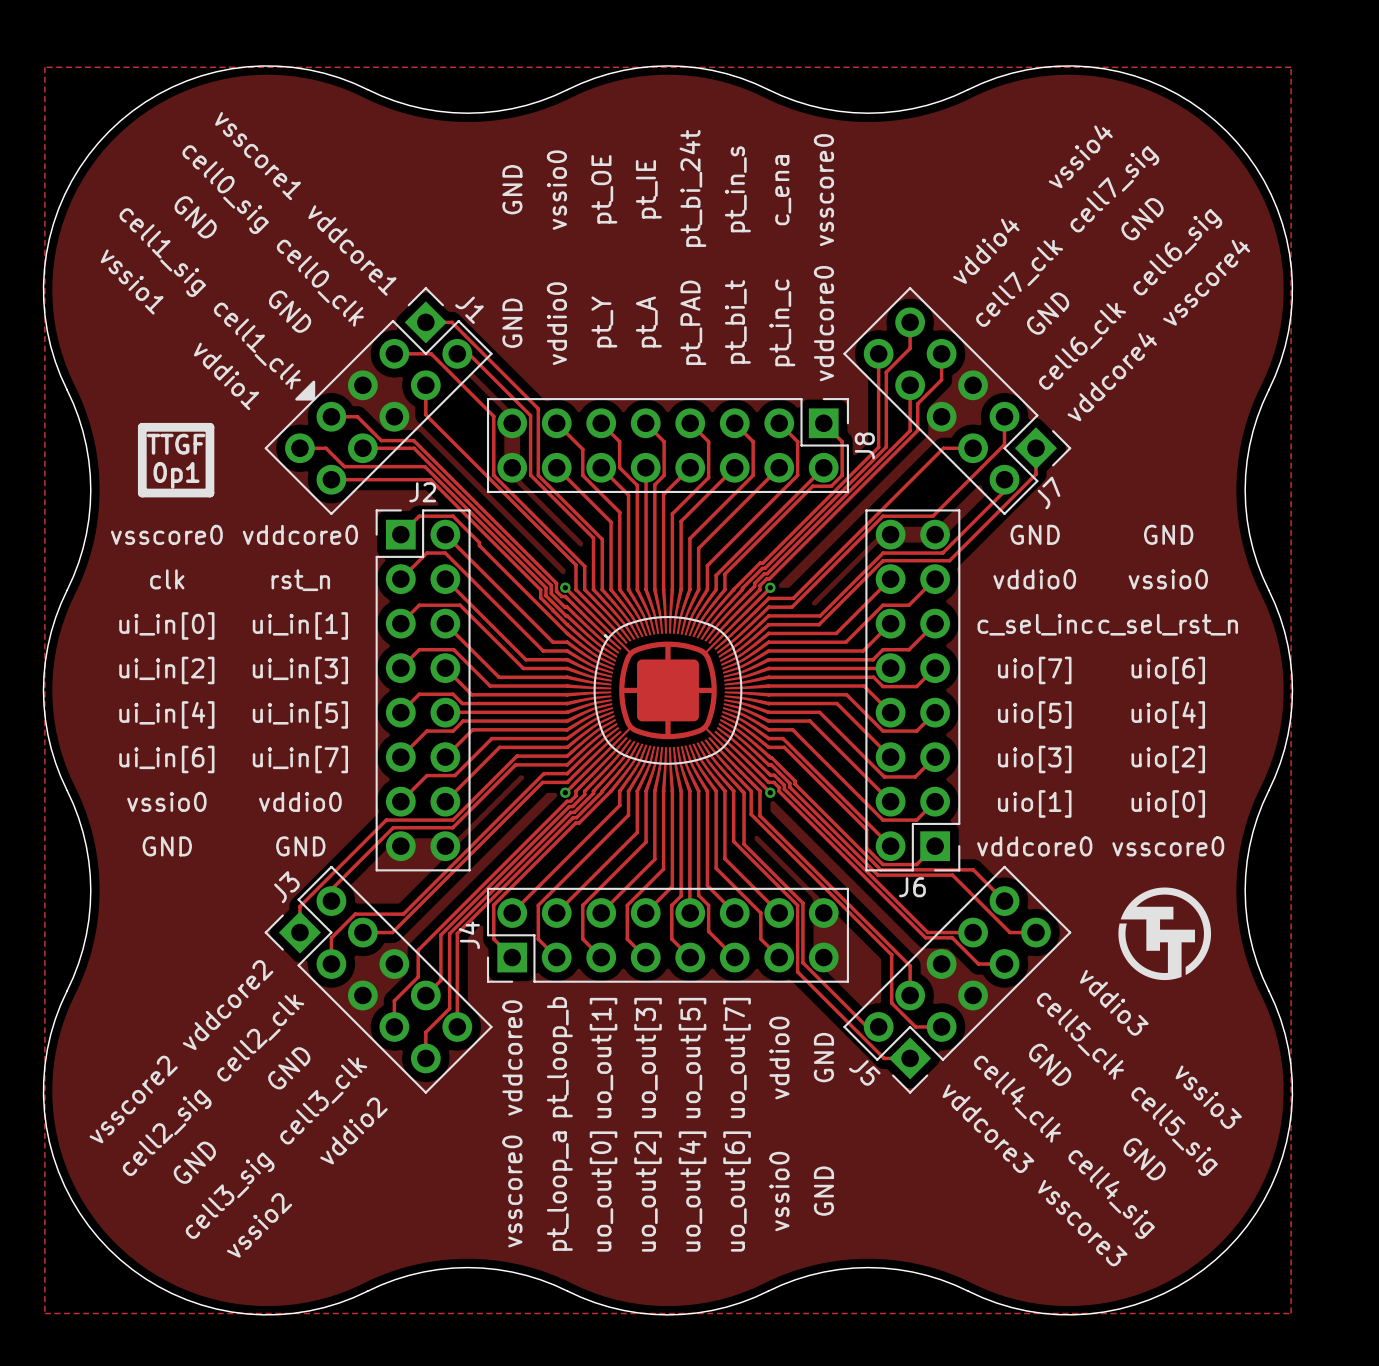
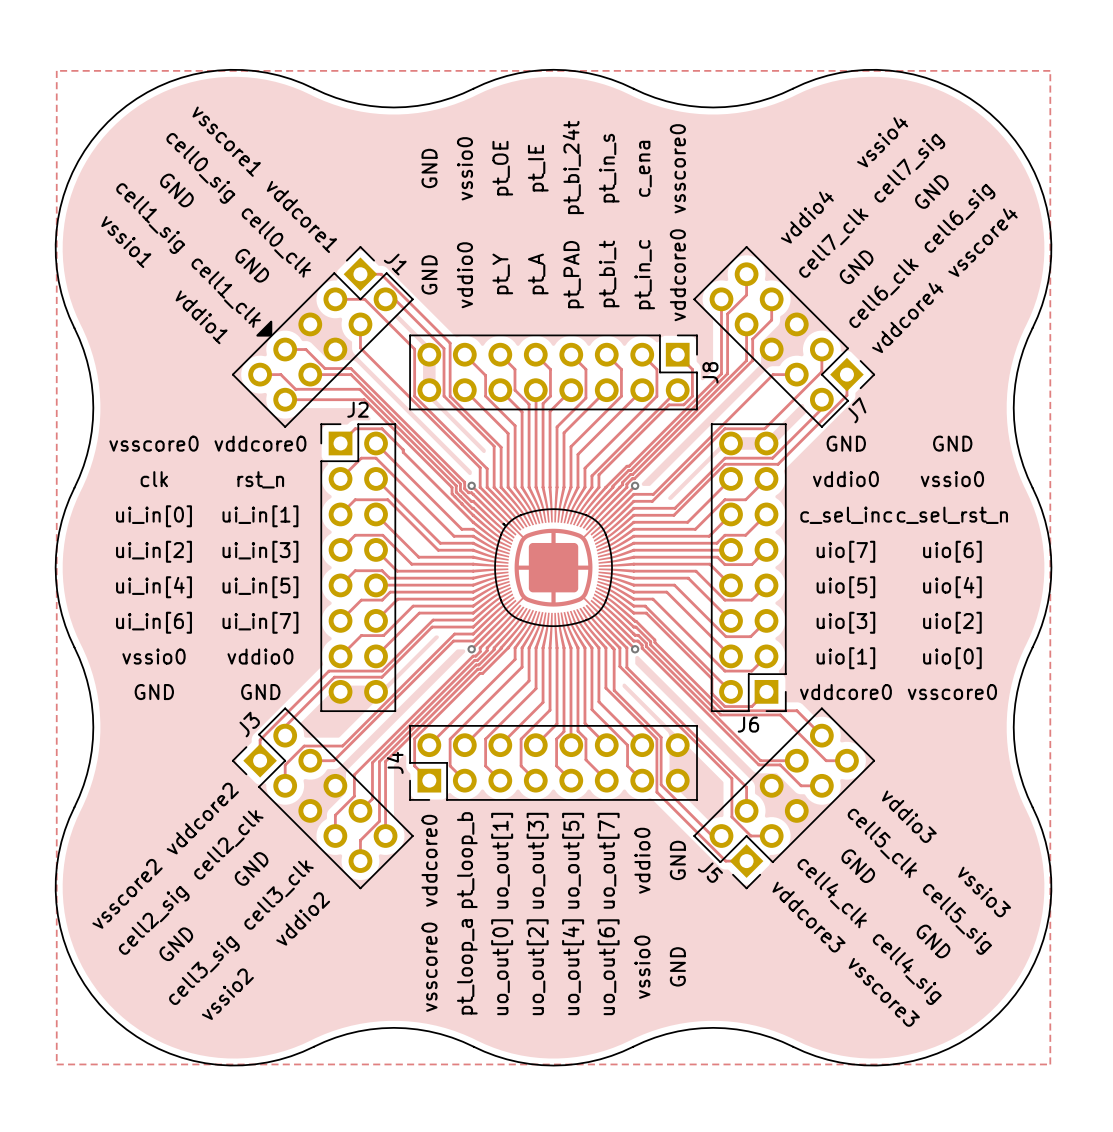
line: (142, 427) (209, 427) (209, 493) (142, 493) (142, 427) -> none
text: TTGF (176, 444) -> none
text: 0p1 (176, 475) -> none
drawing: [1118, 887, 1212, 981] -> none

